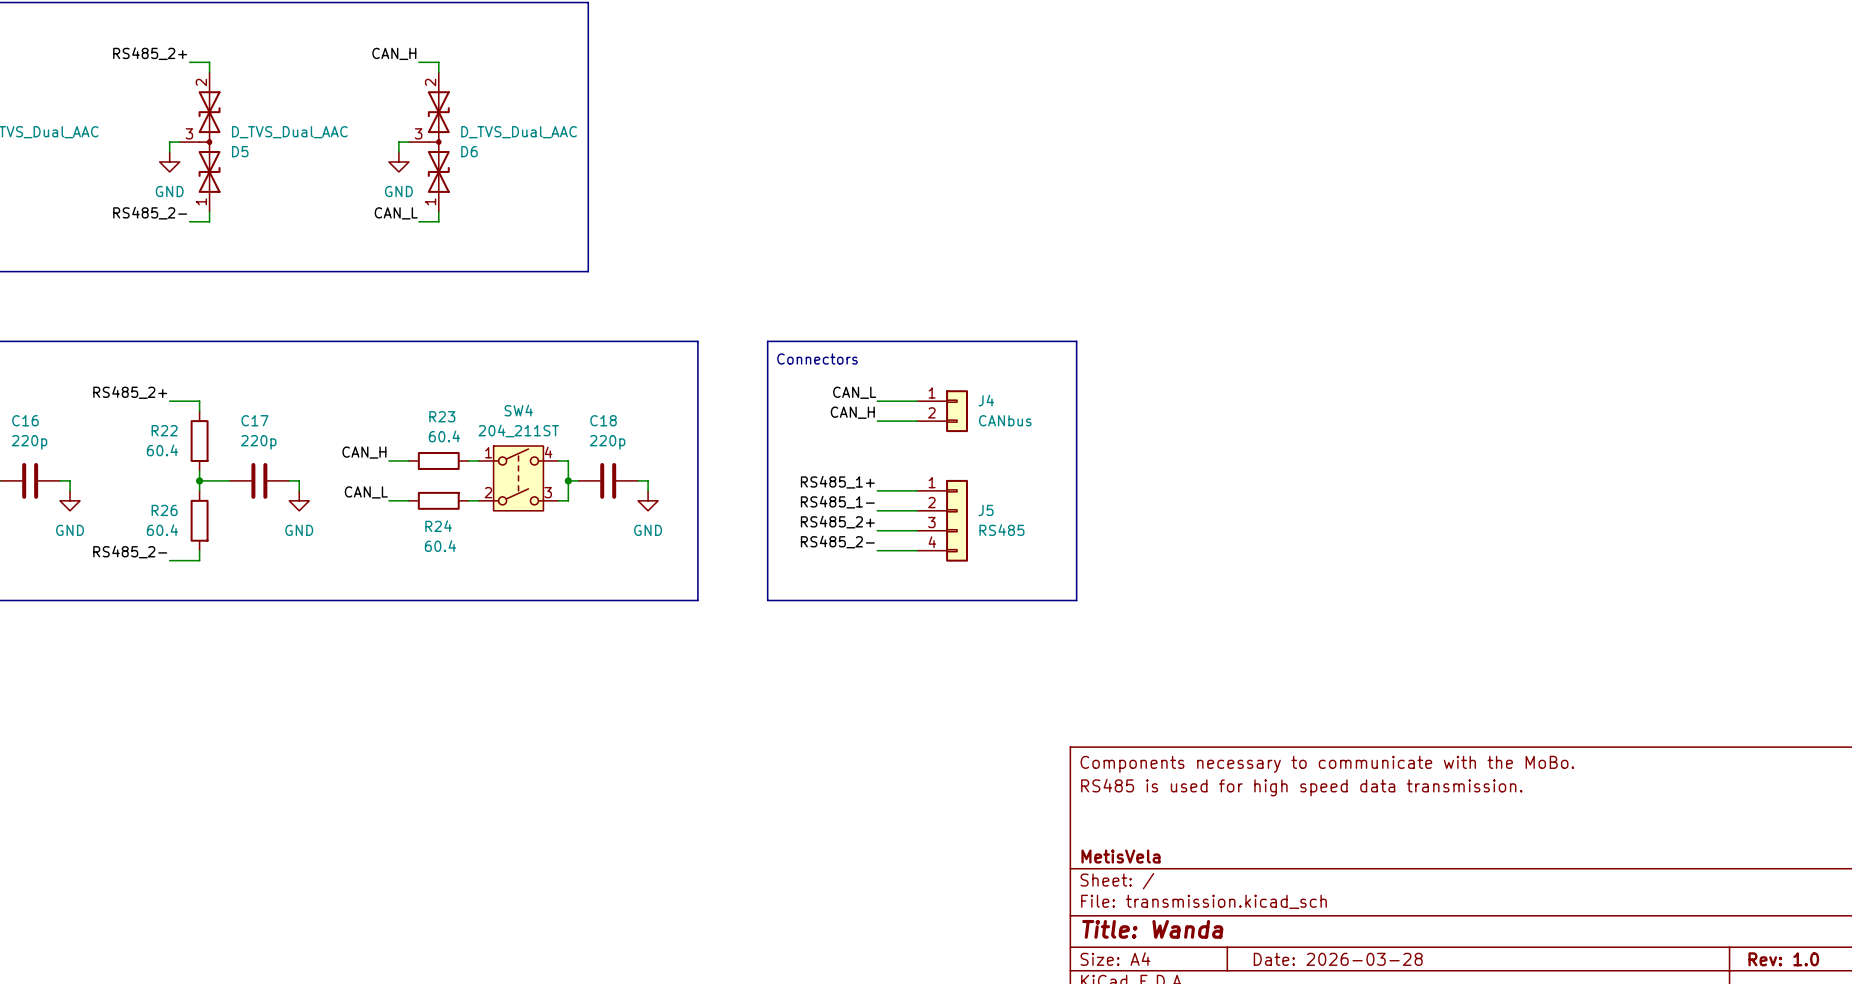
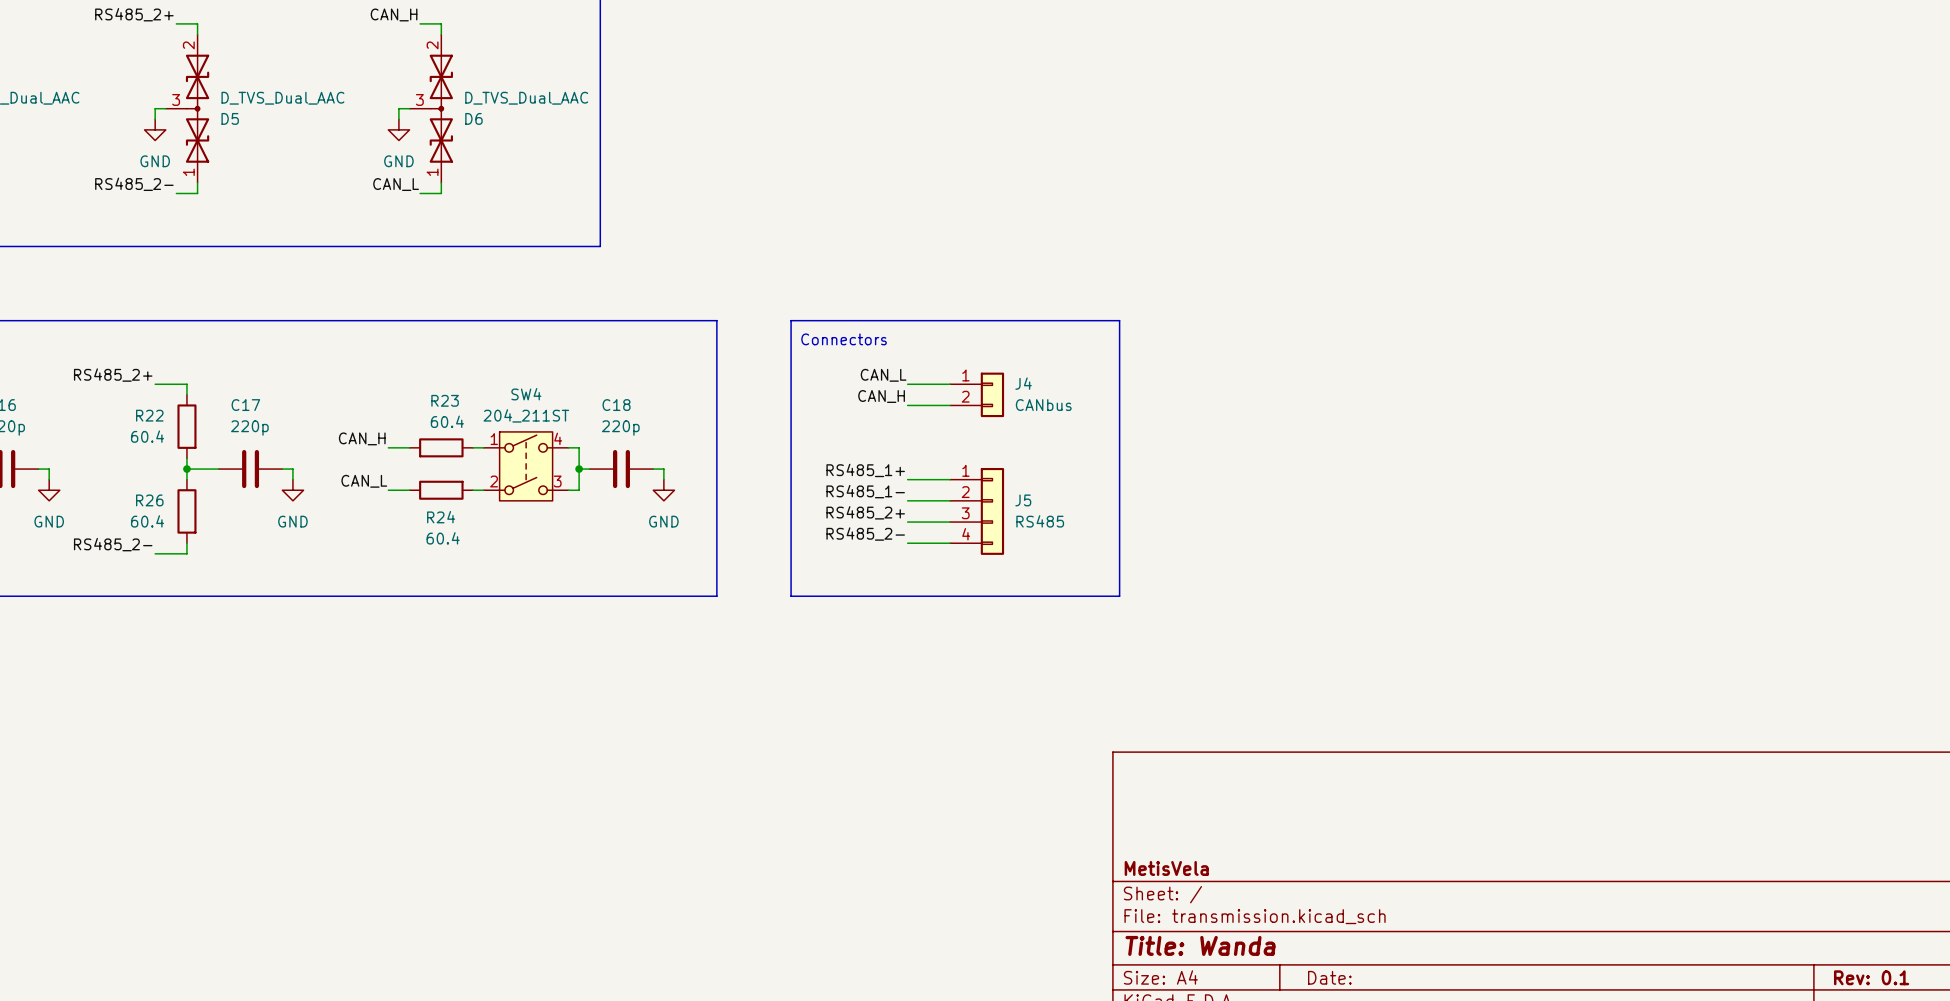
title block: Components necessary to communicate with the MoBo. (1327, 764) -> none
title block: RS485 is used for high speed data transmission. (1301, 787) -> none
title block: Date: 2026-03-28 (1338, 959) -> Date: (1329, 977)
title block: Rev: 1.0 (1783, 959) -> Rev: 0.1 (1871, 977)

